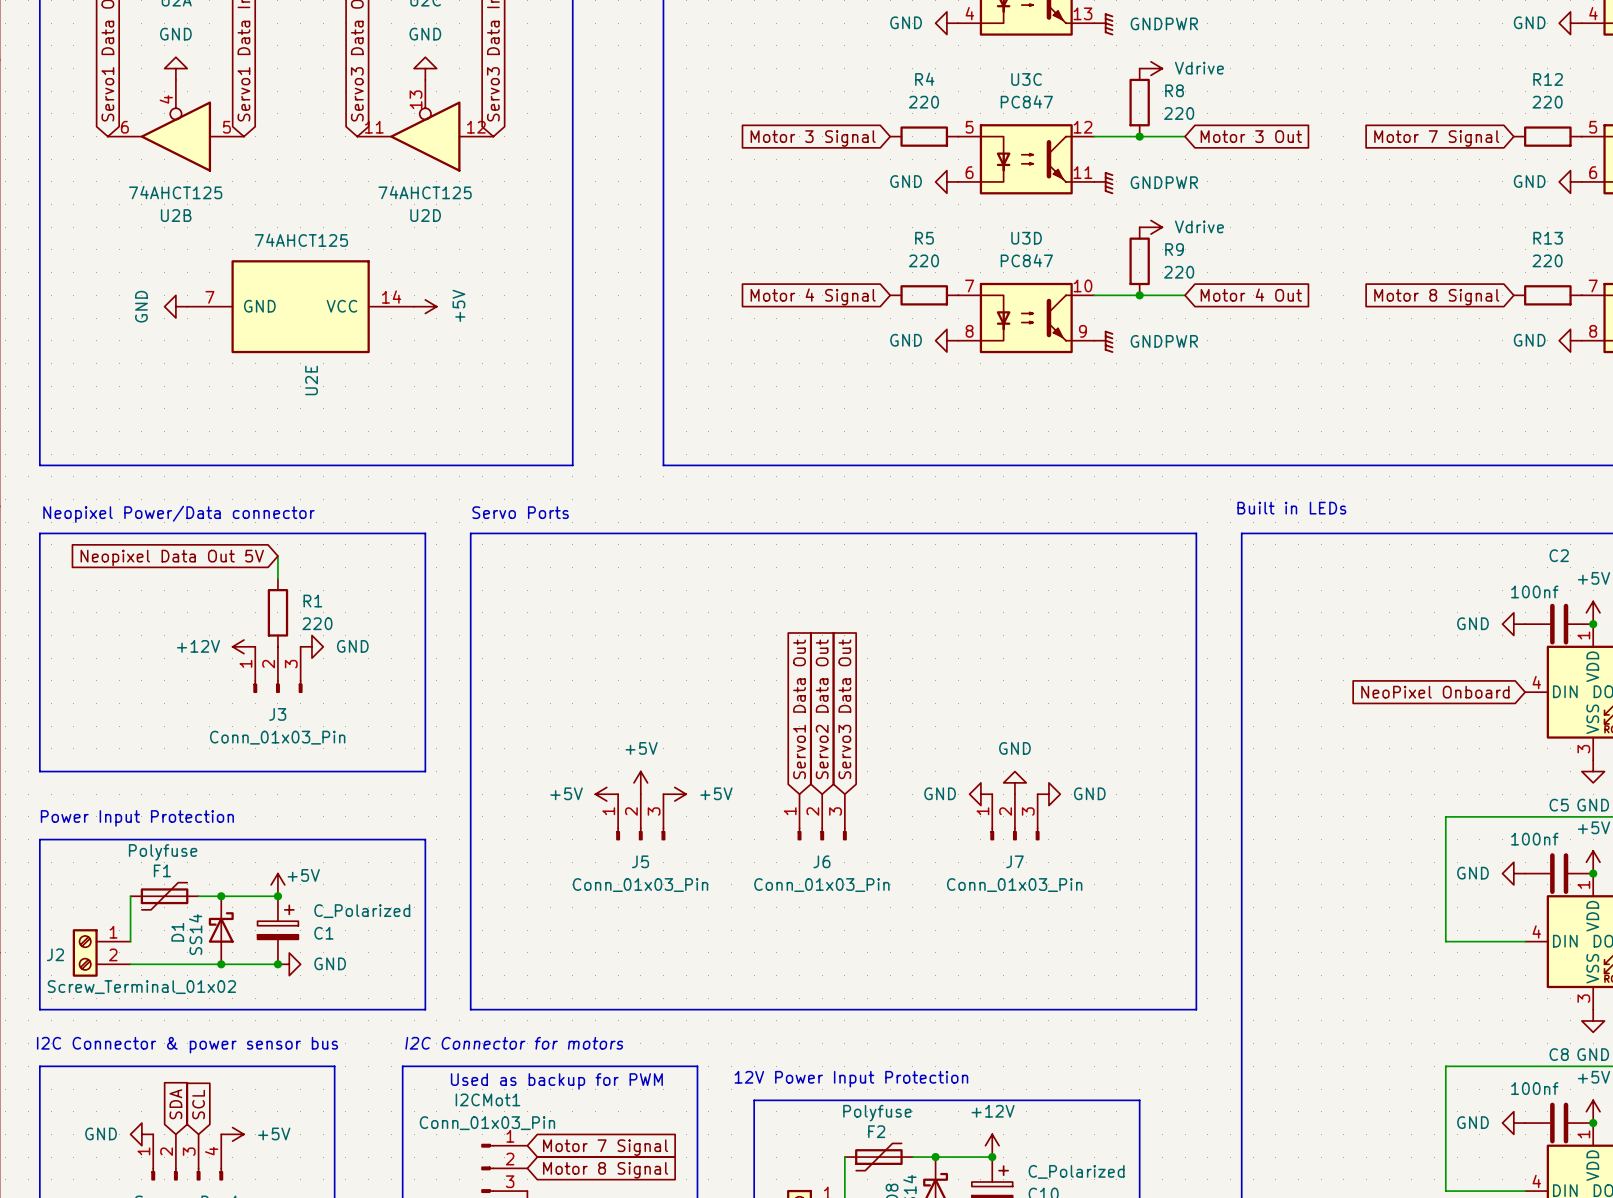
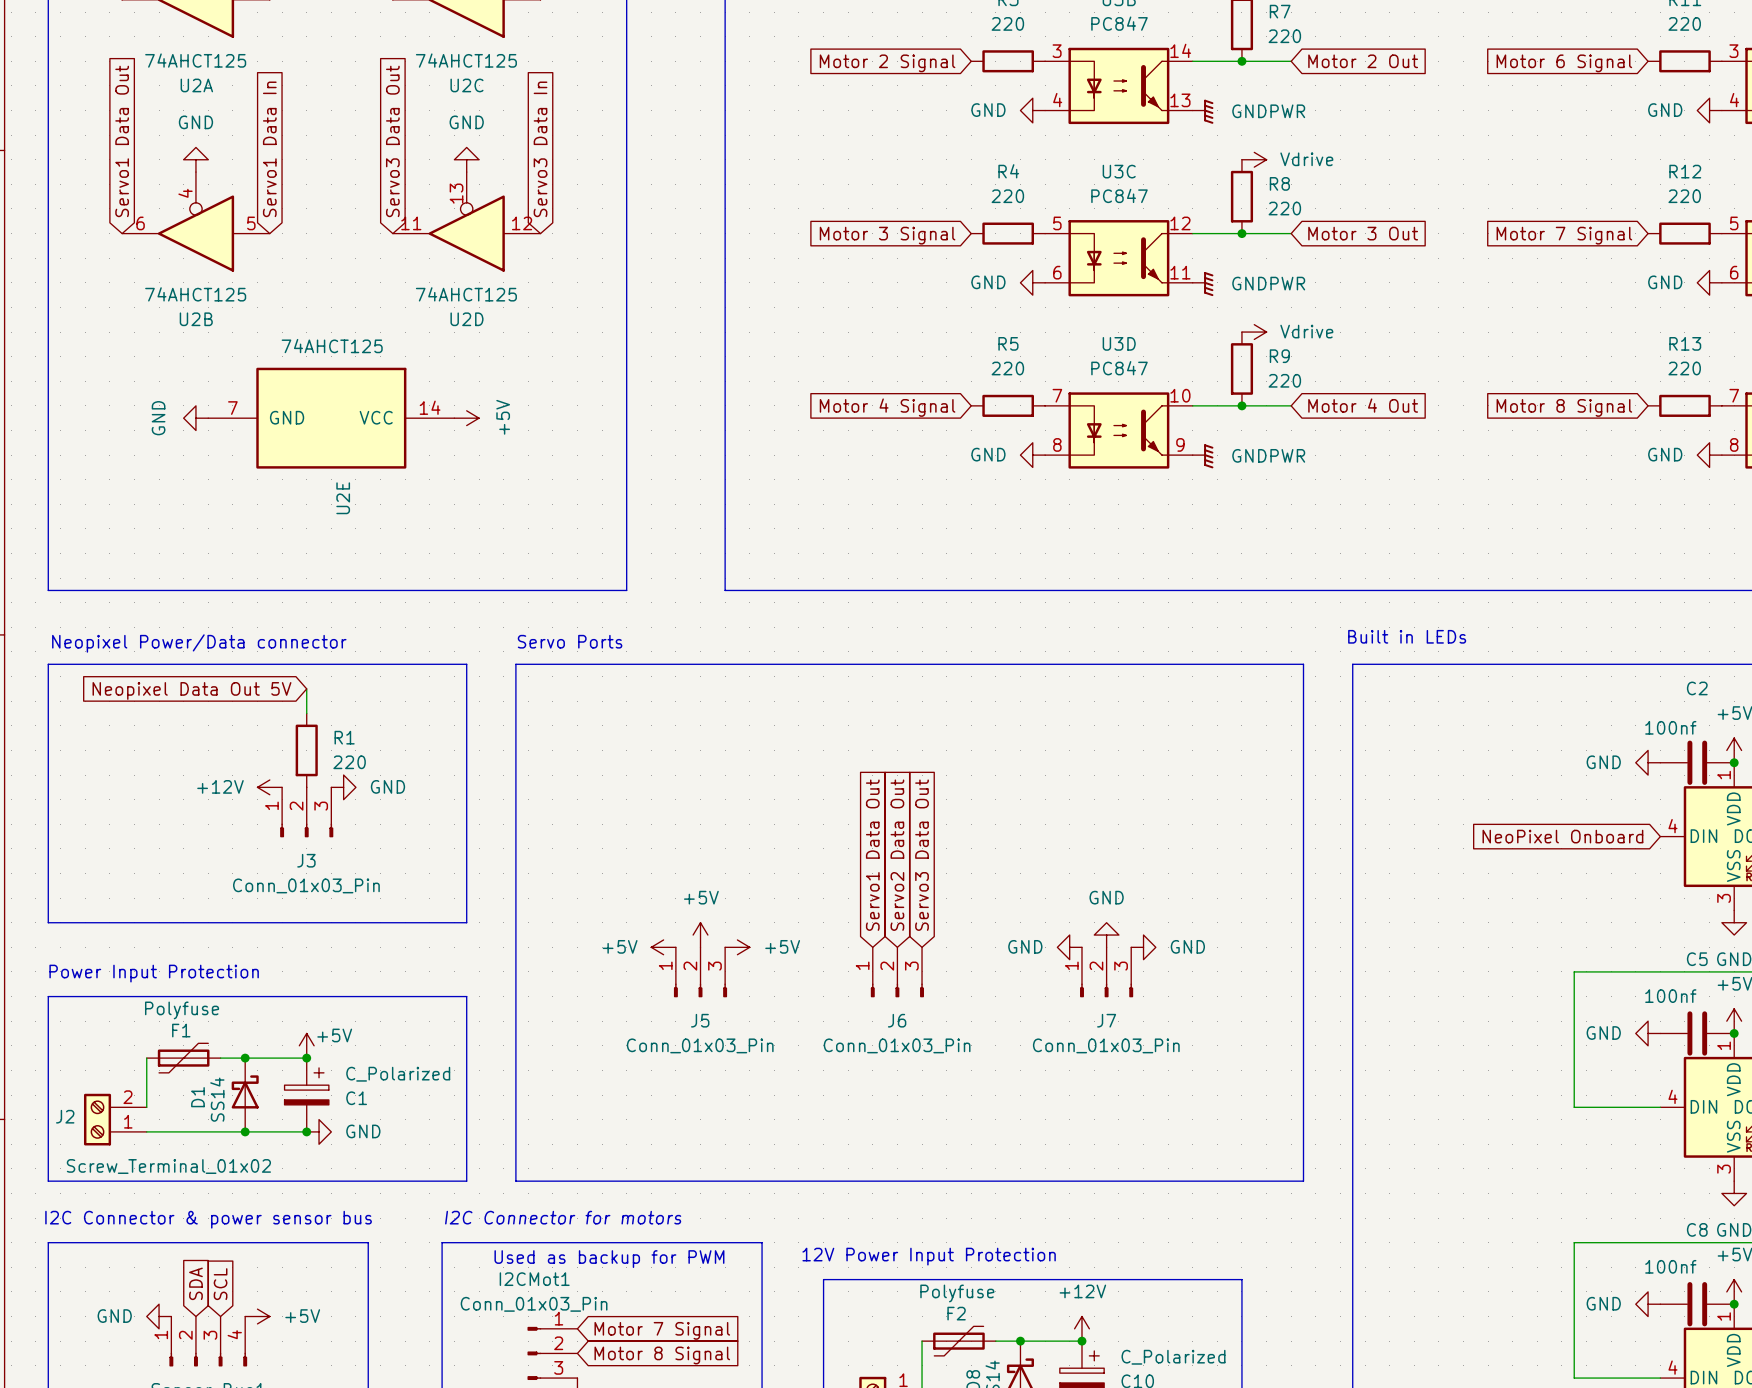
J2 flip: as is (85, 952) -> up-down (97, 1119)

